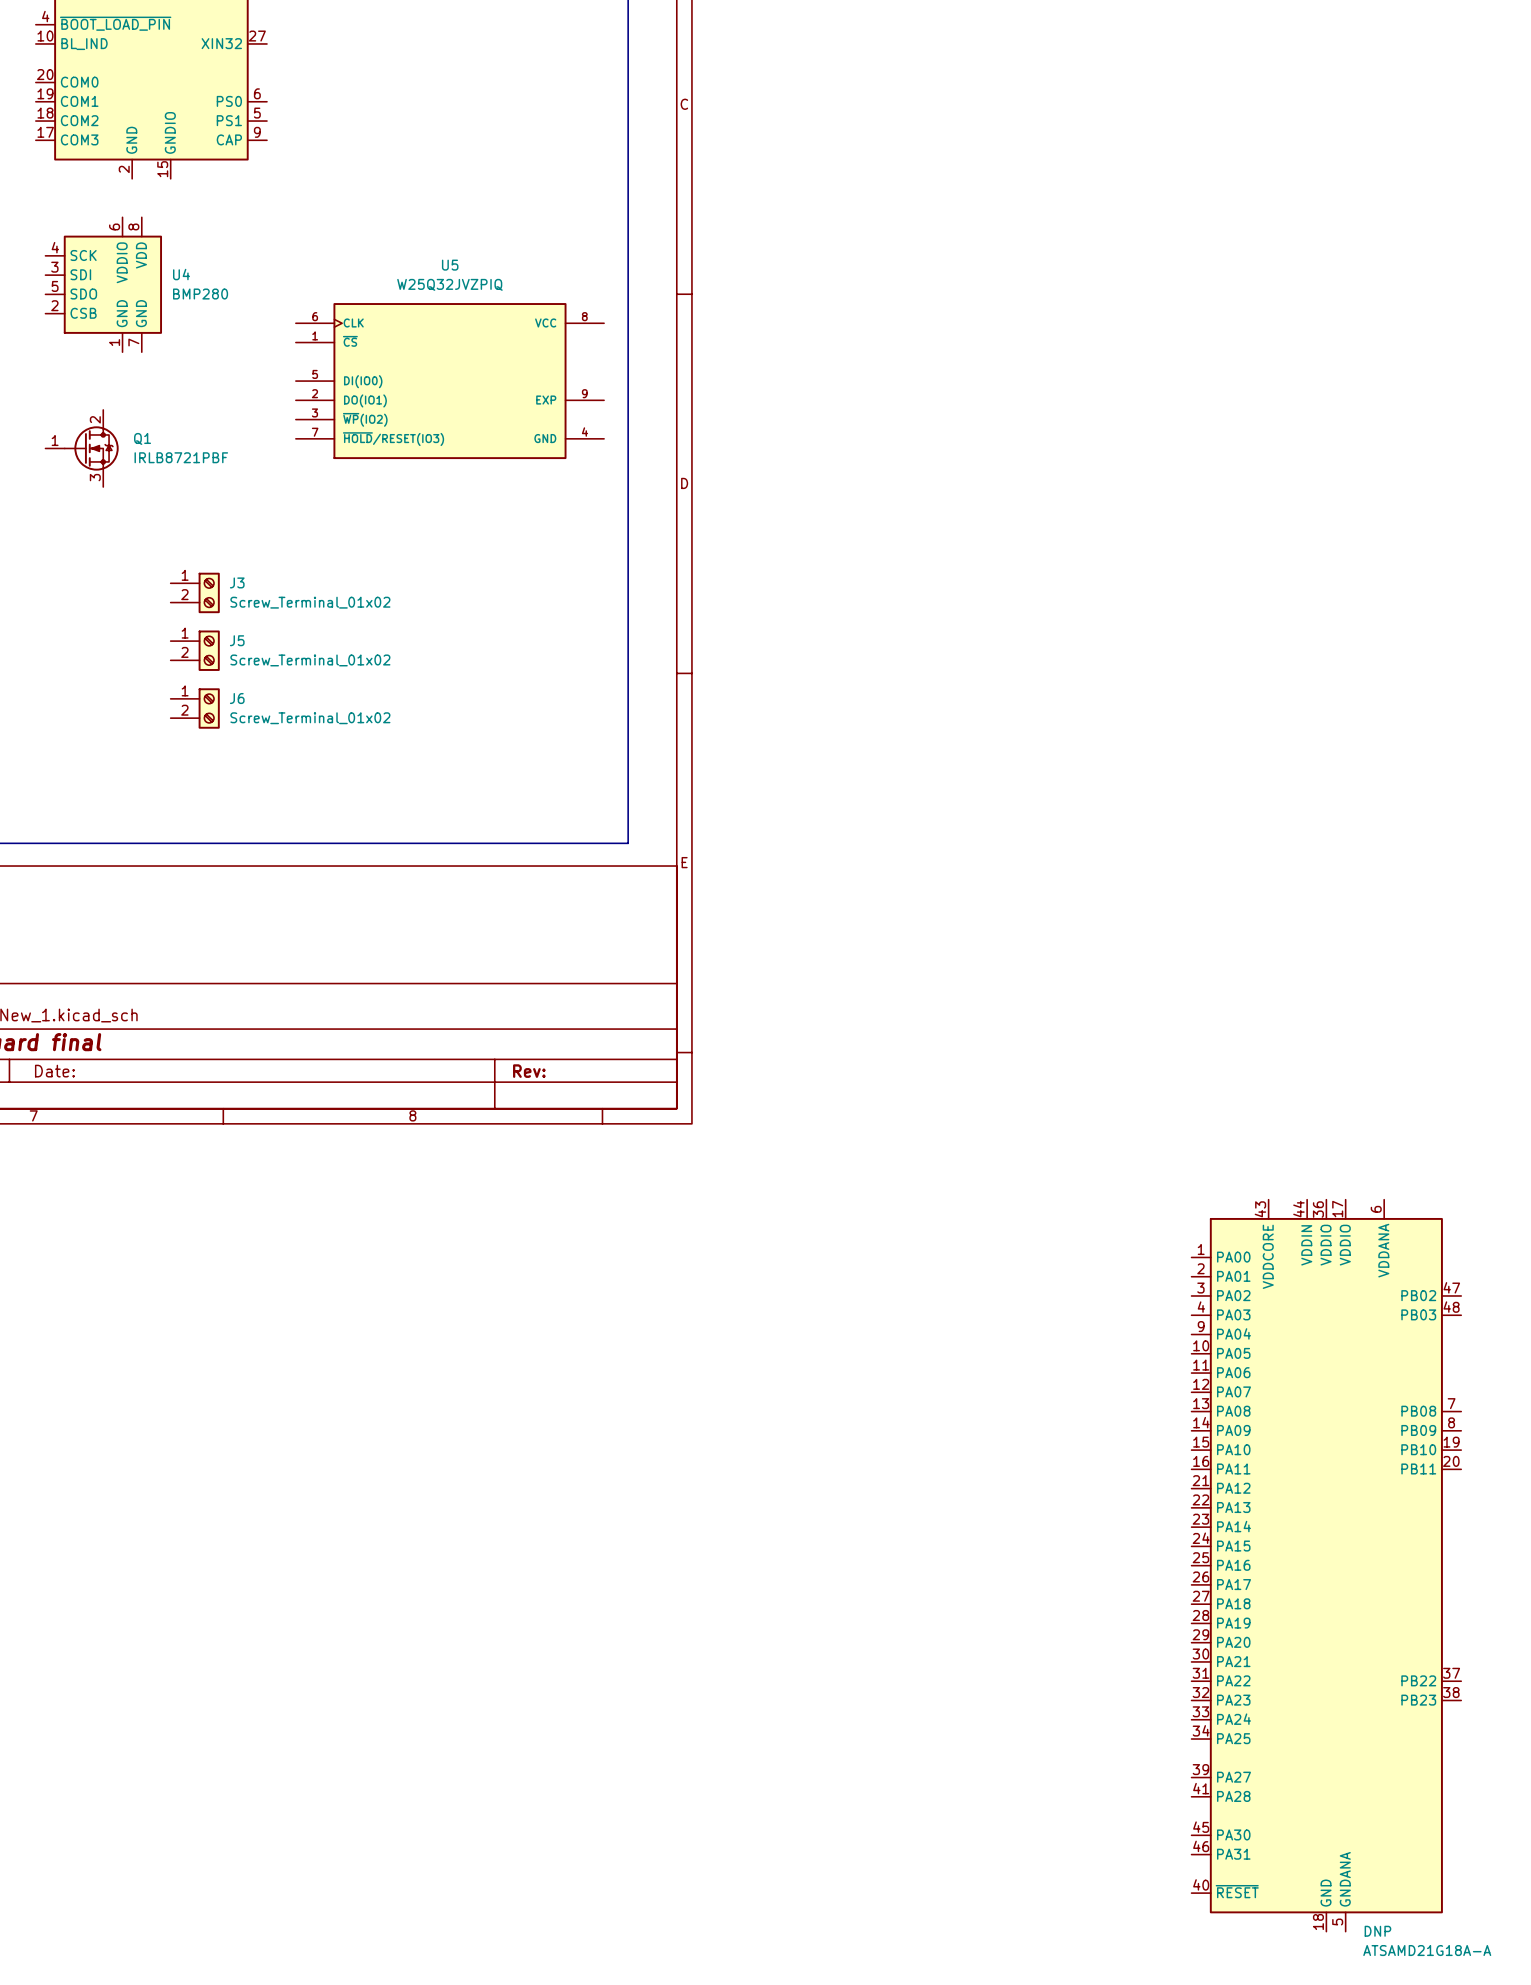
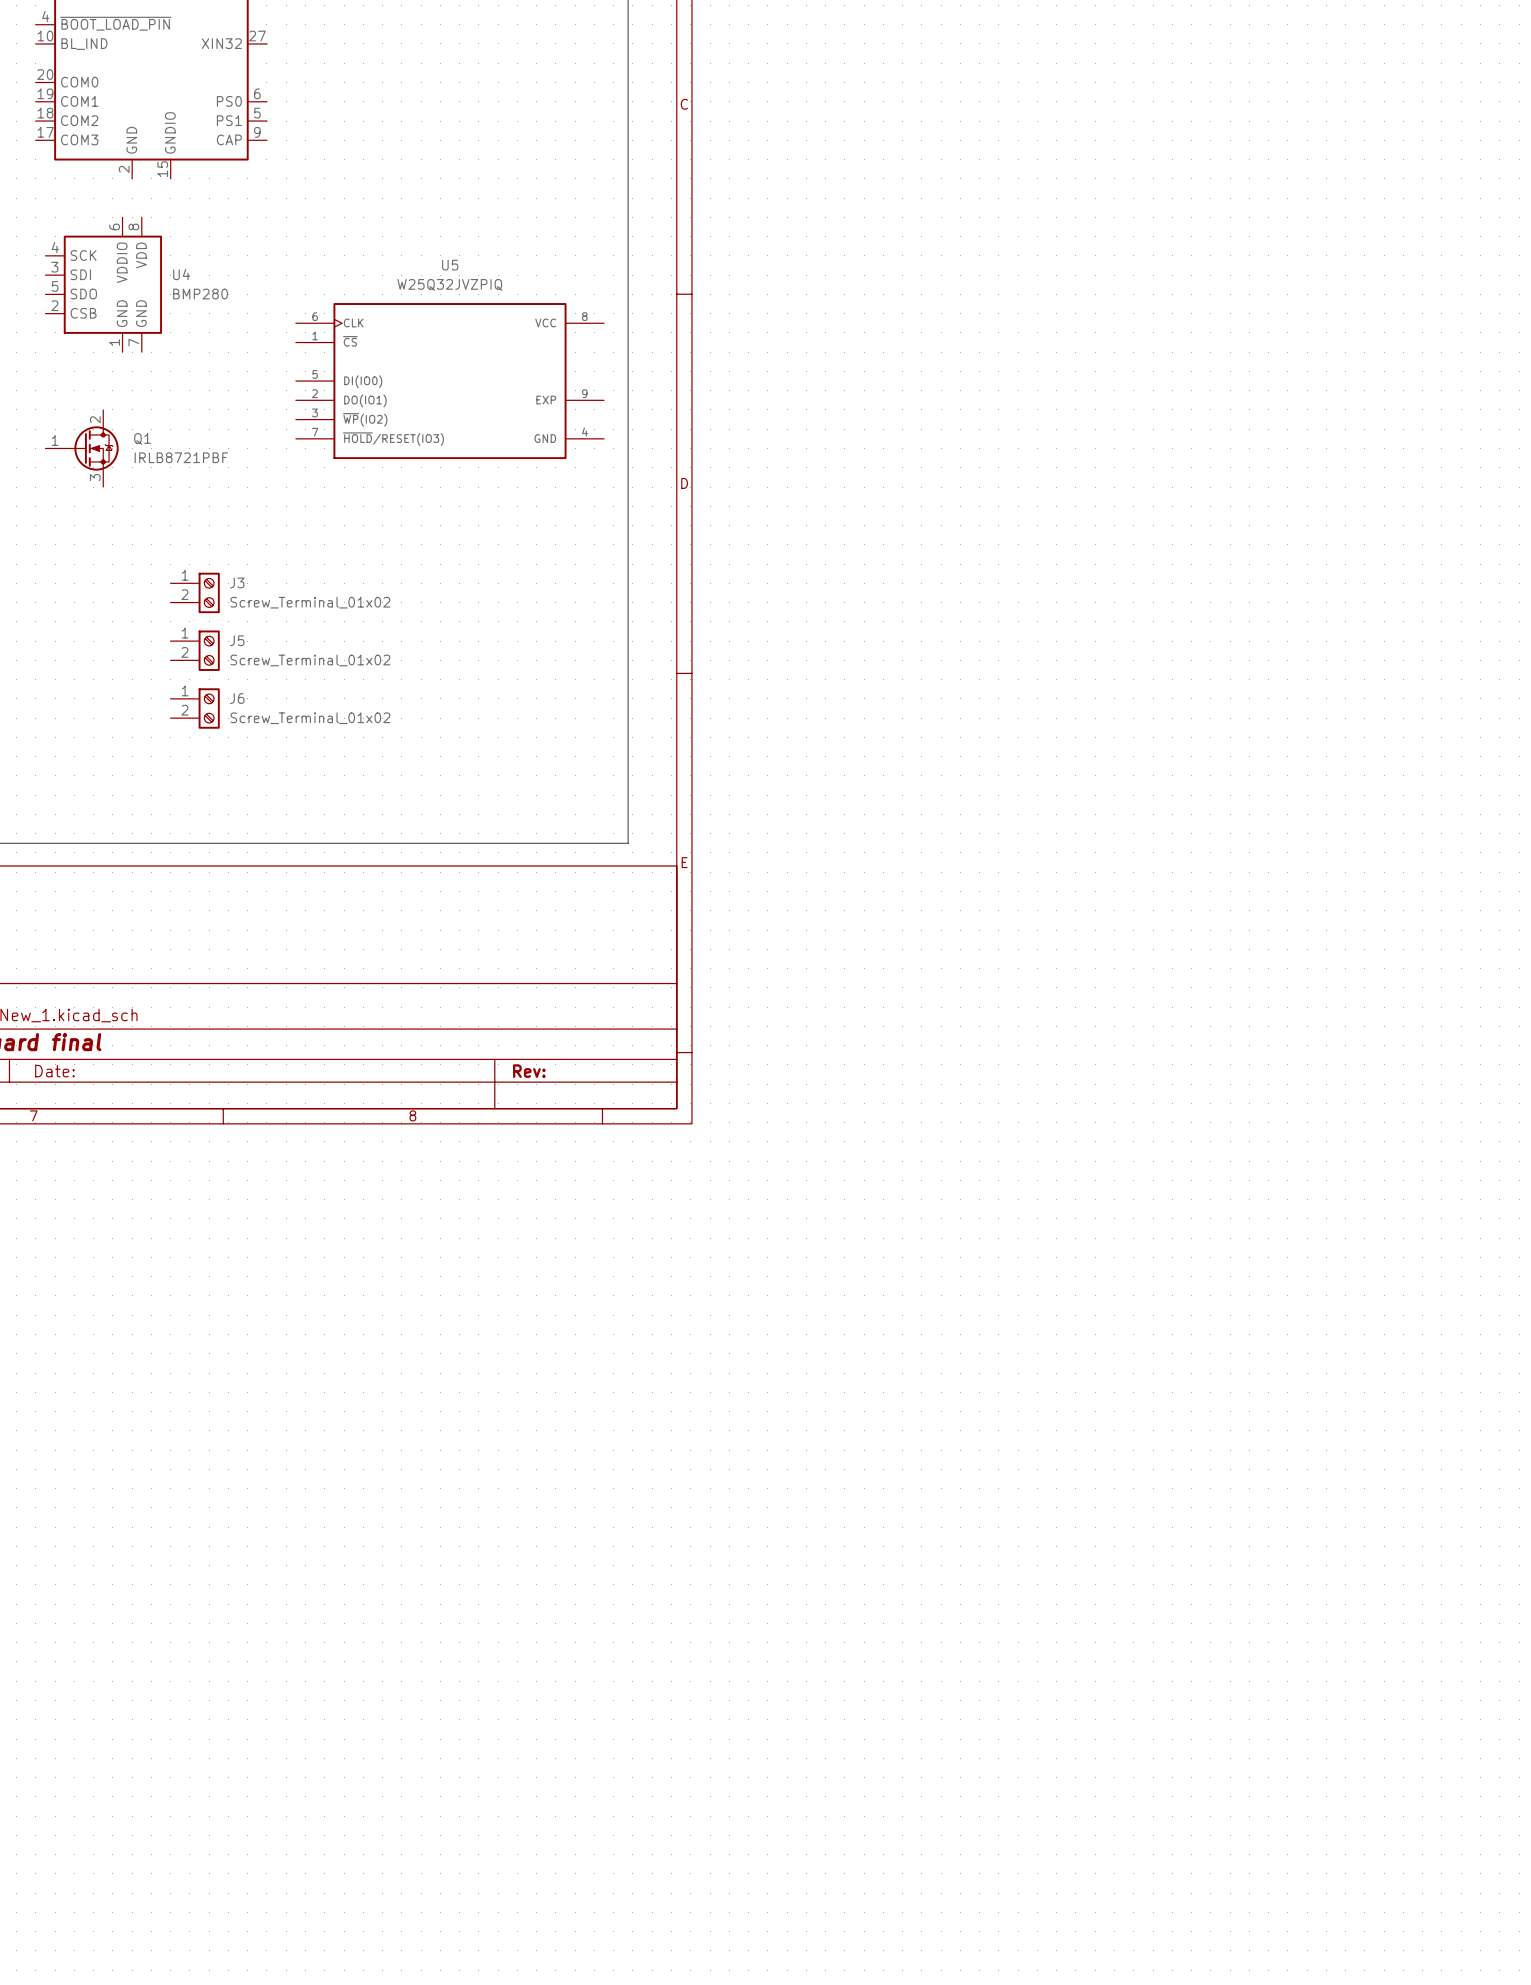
DNP: ATSAMD21G18A-A (1326, 1565) -> none

